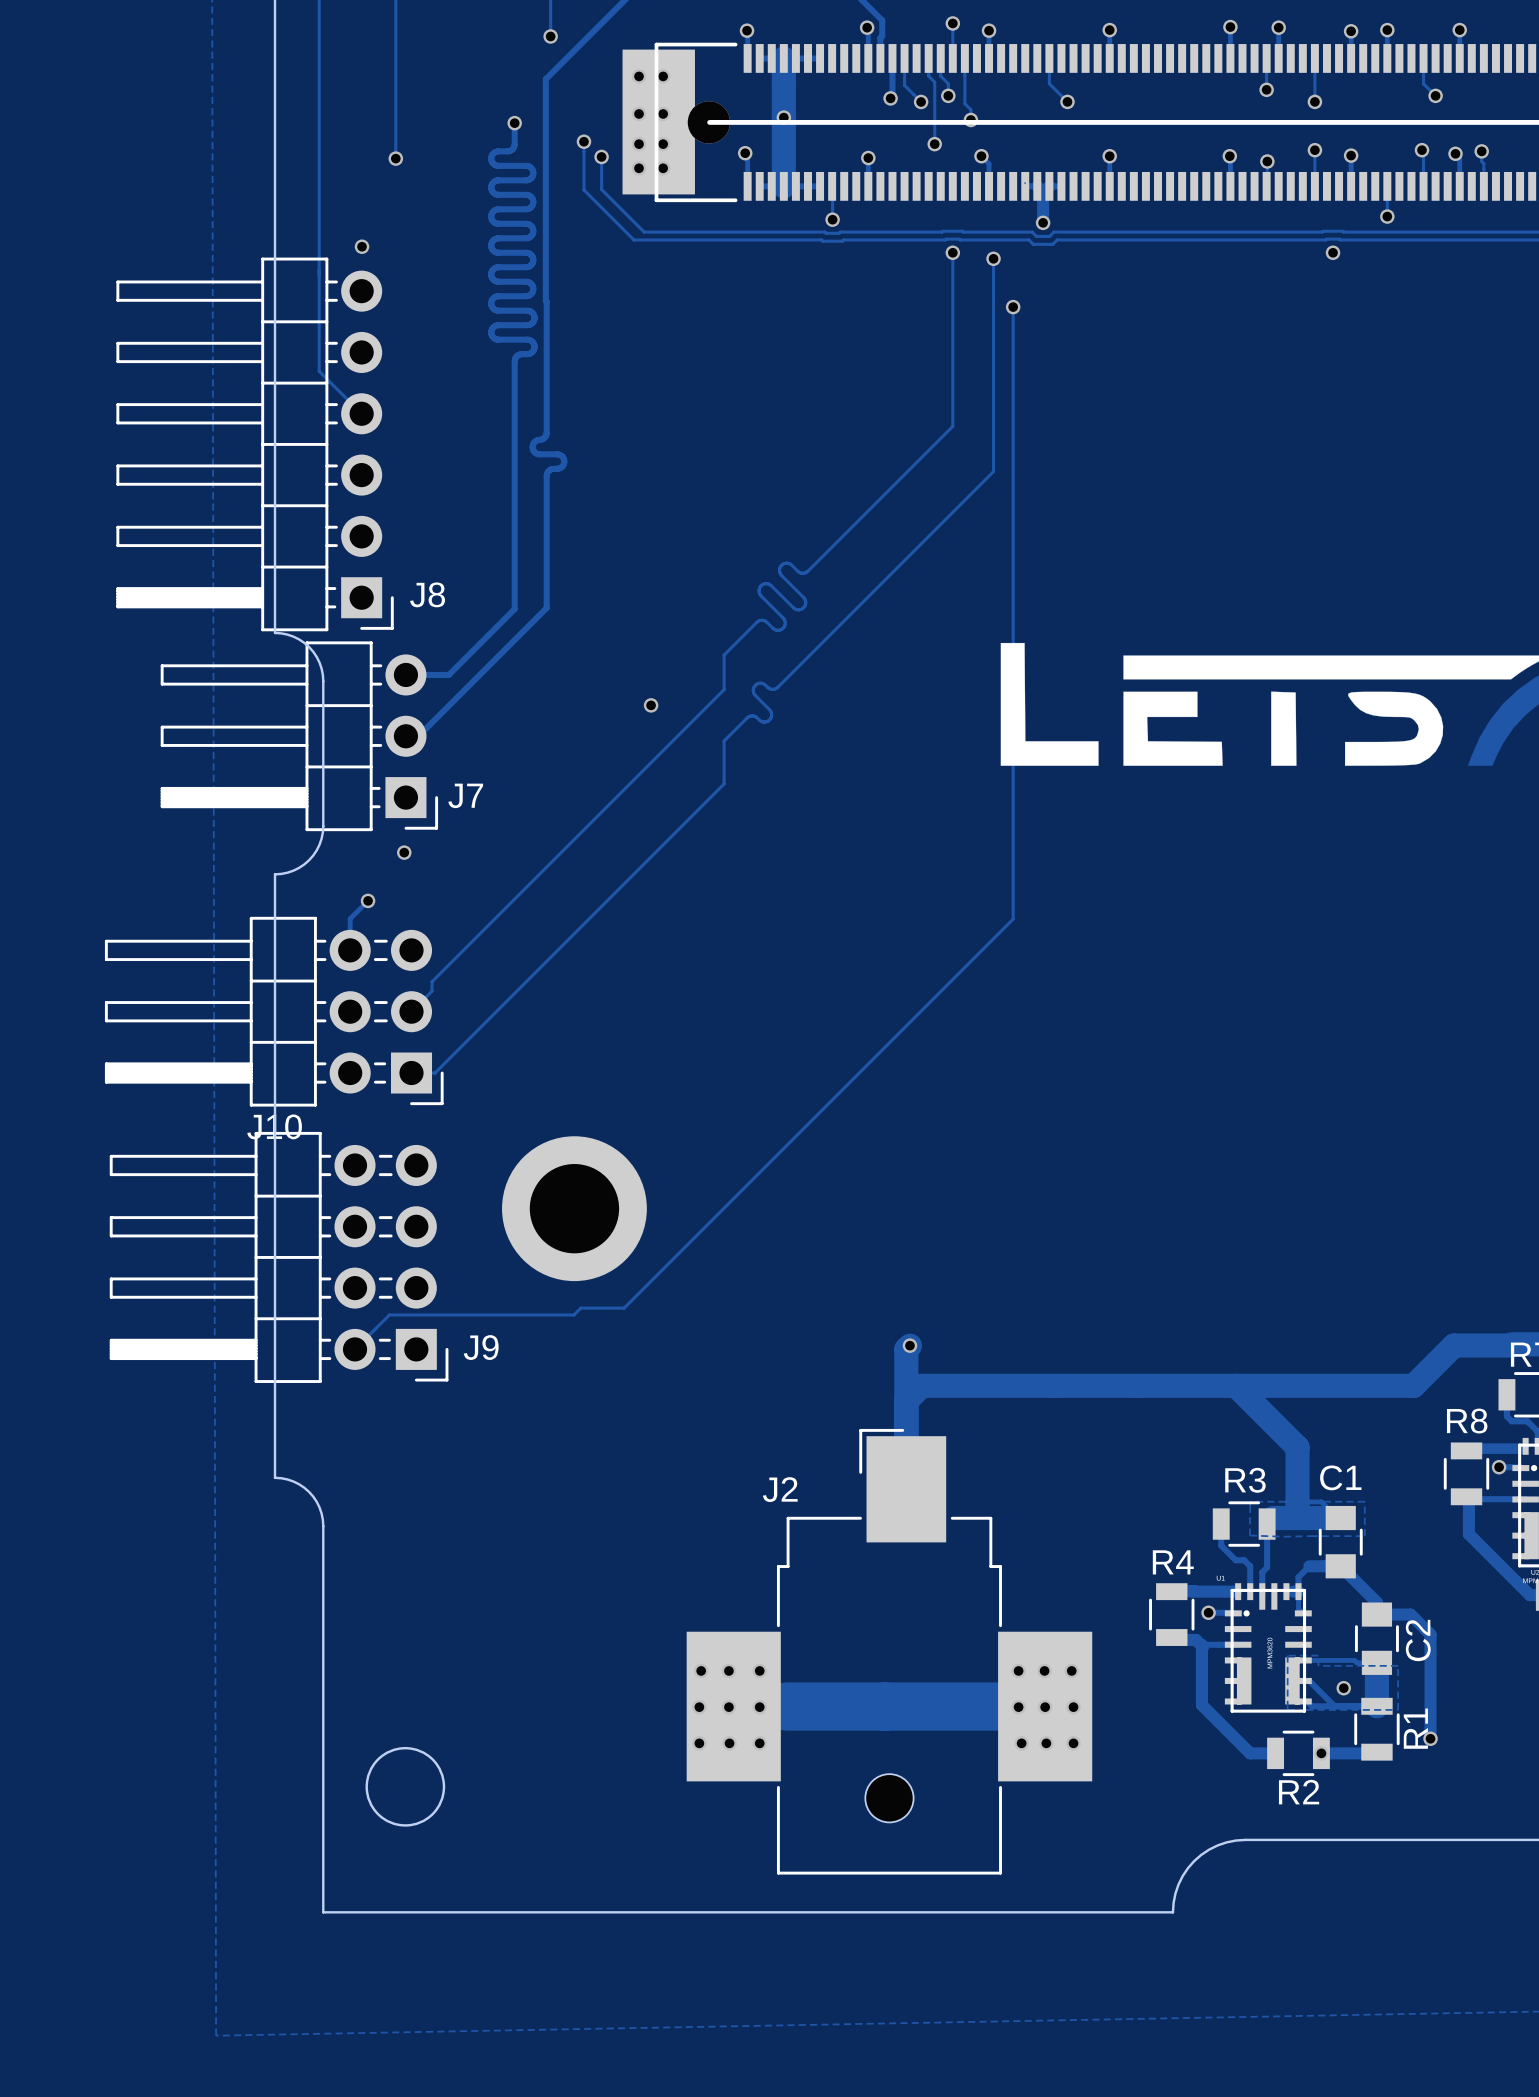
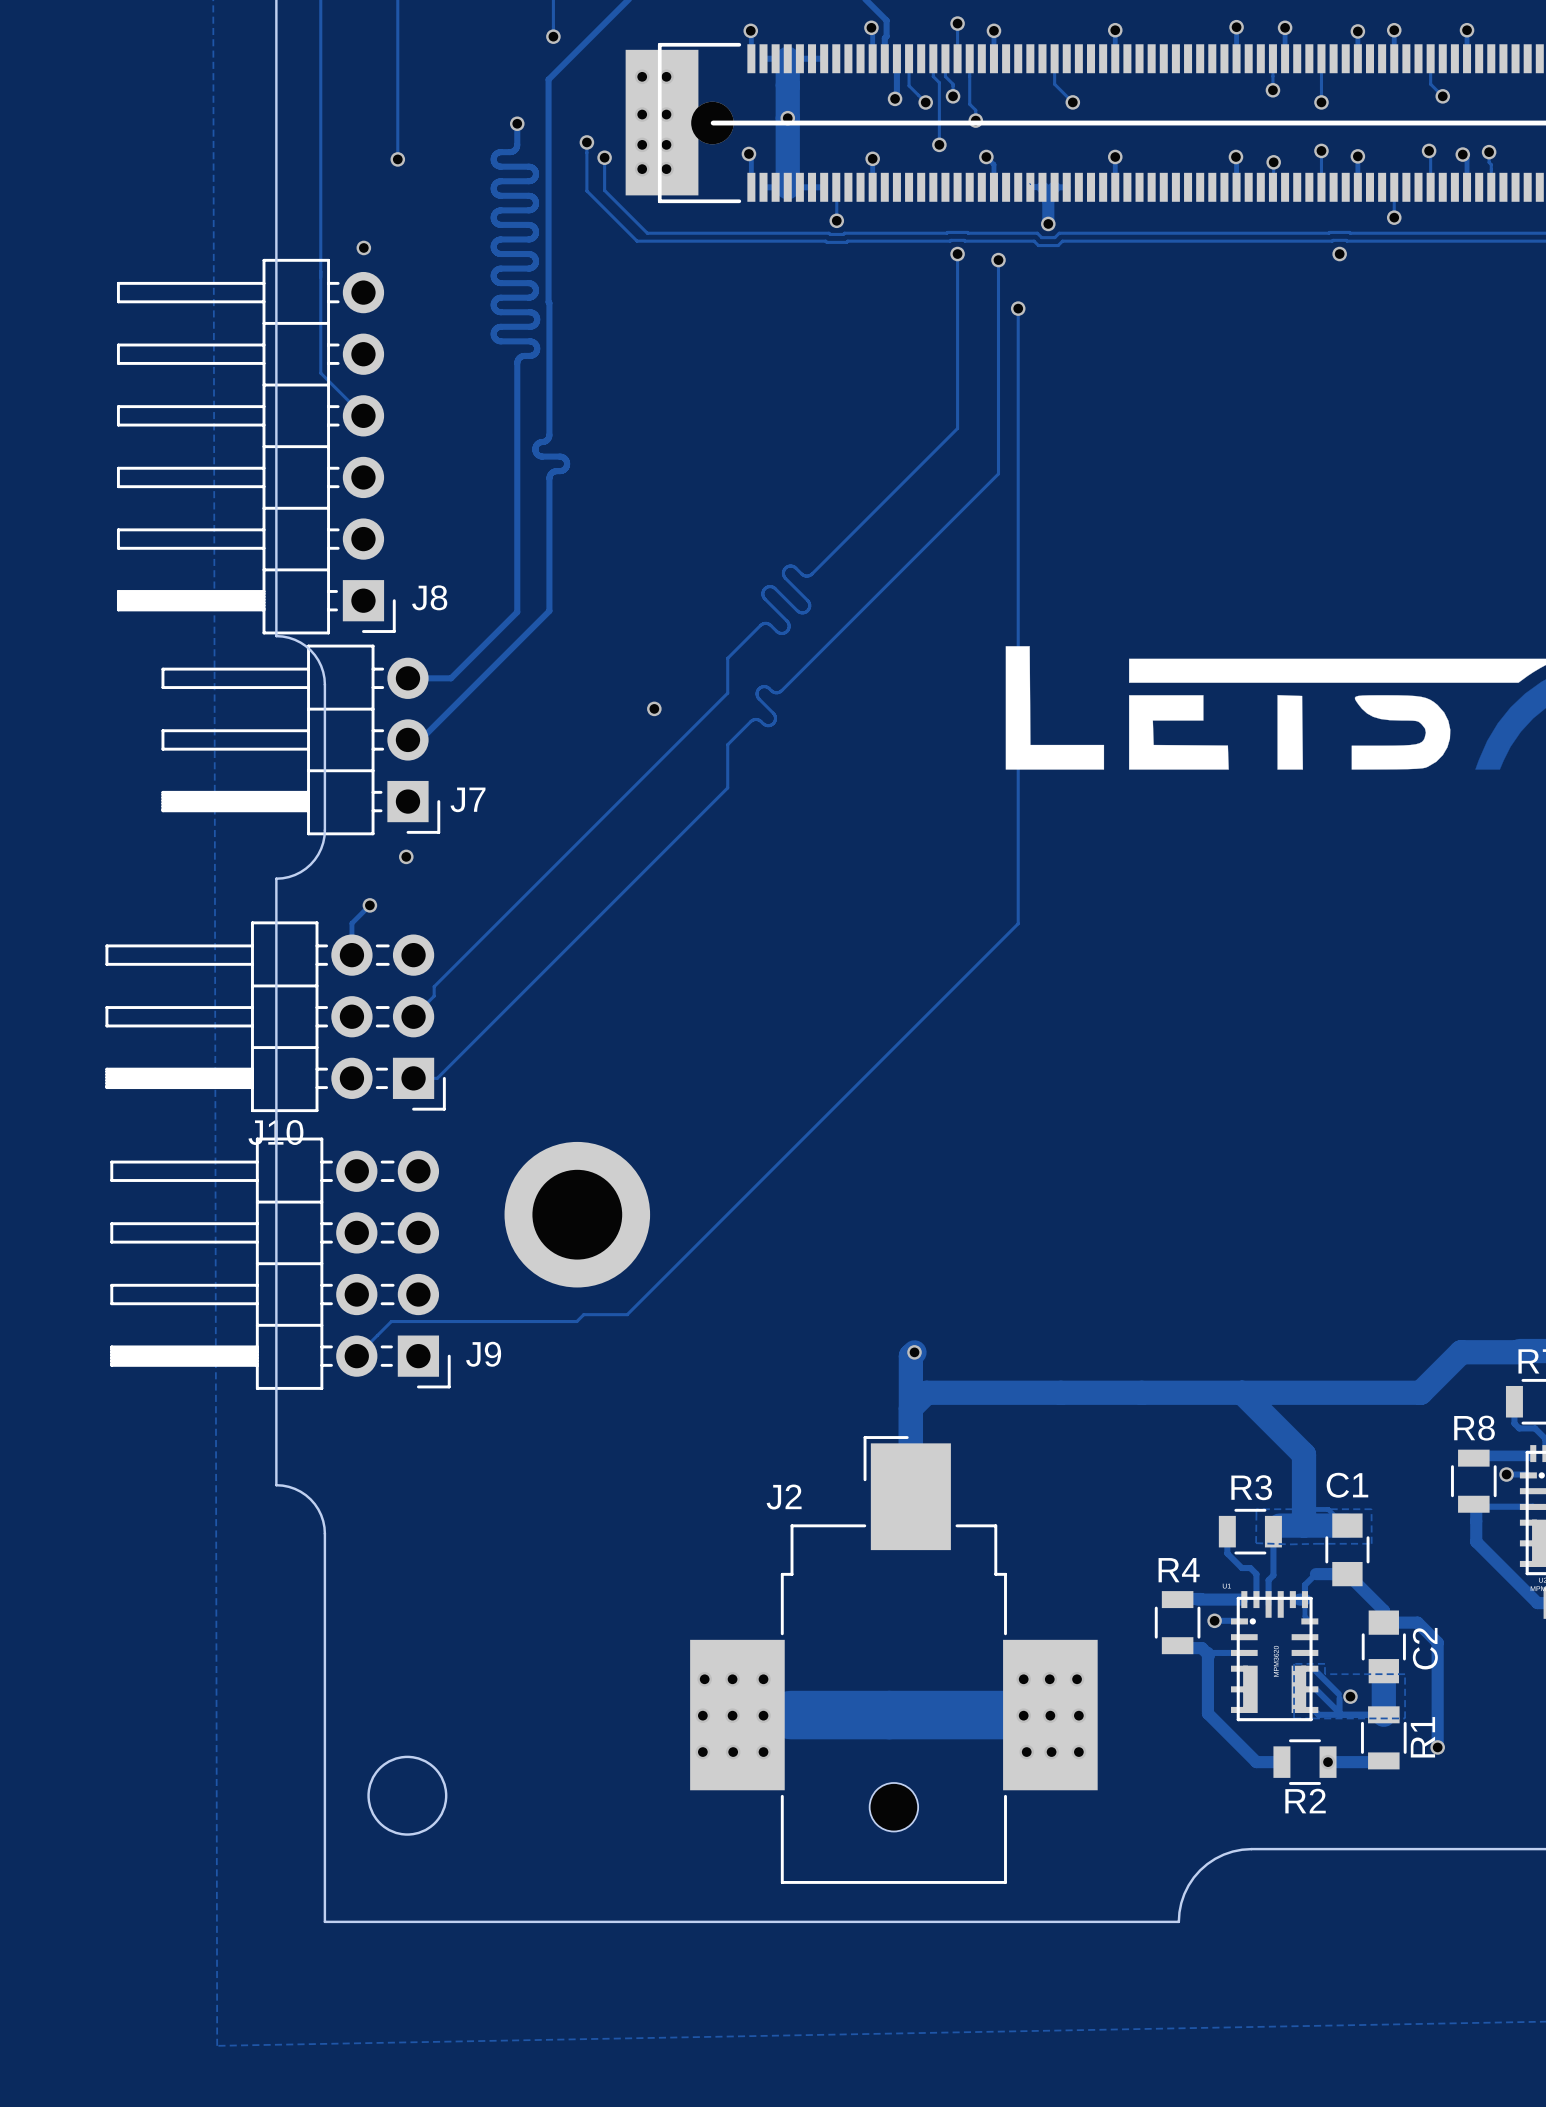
track: (1306, 1660) (1354, 1660) (1357, 1662) (1376, 1662) -> (1313, 1668) (1338, 1694)
track: none -> (1339, 1698) (1339, 1714)

